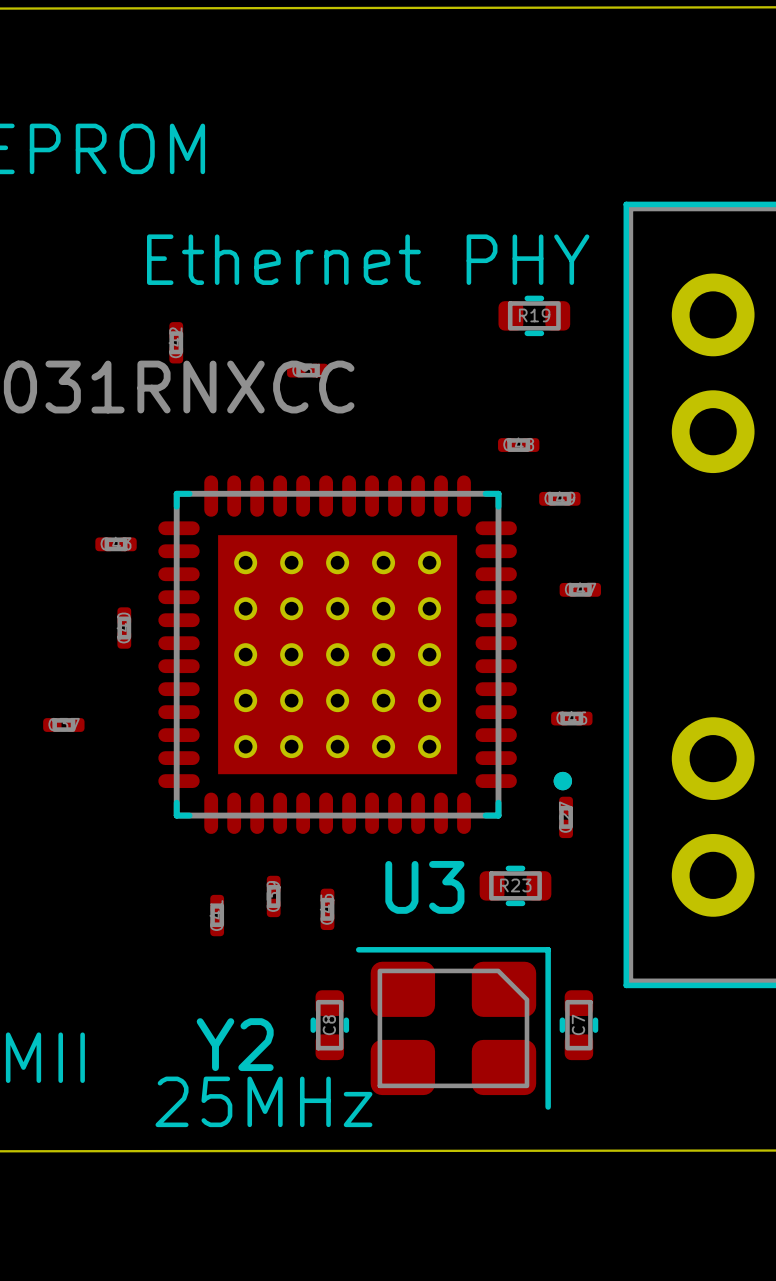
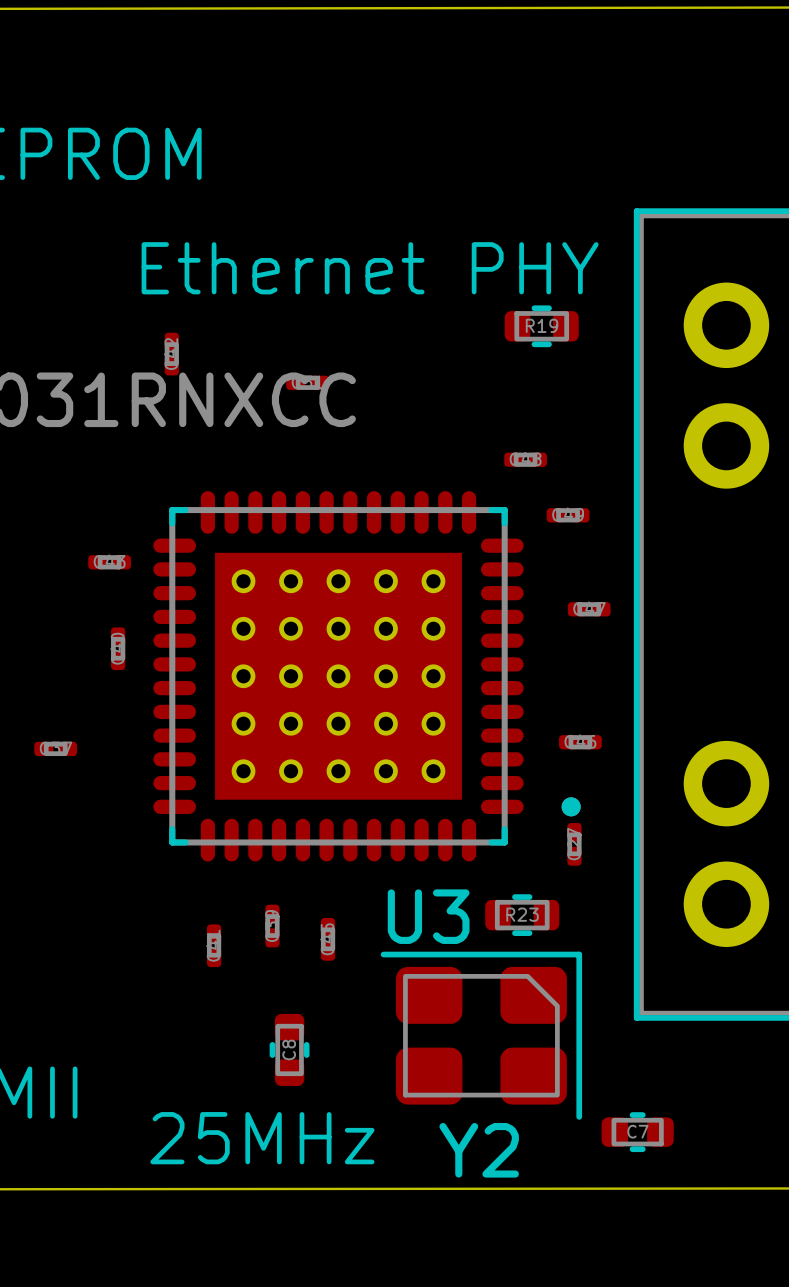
C8 position: (329, 1025) -> (289, 1049)
C7 rotation: 0° (578, 1025) -> 90° clockwise (637, 1132)
C7 position: (578, 1025) -> (637, 1132)
Y2 position: (453, 1028) -> (481, 1035)
Y2 name position: Y2 (235, 1044) -> Y2 (479, 1150)

